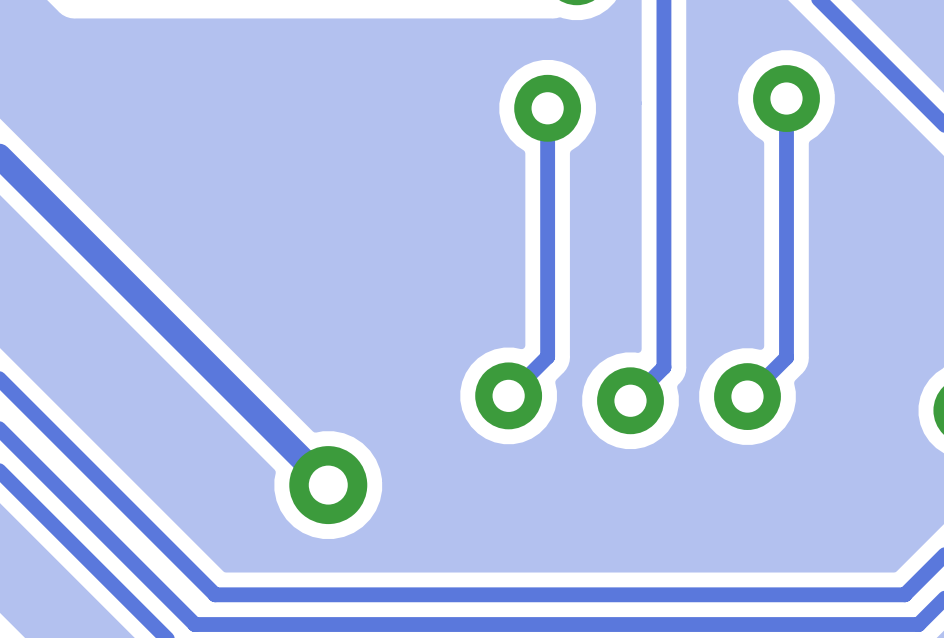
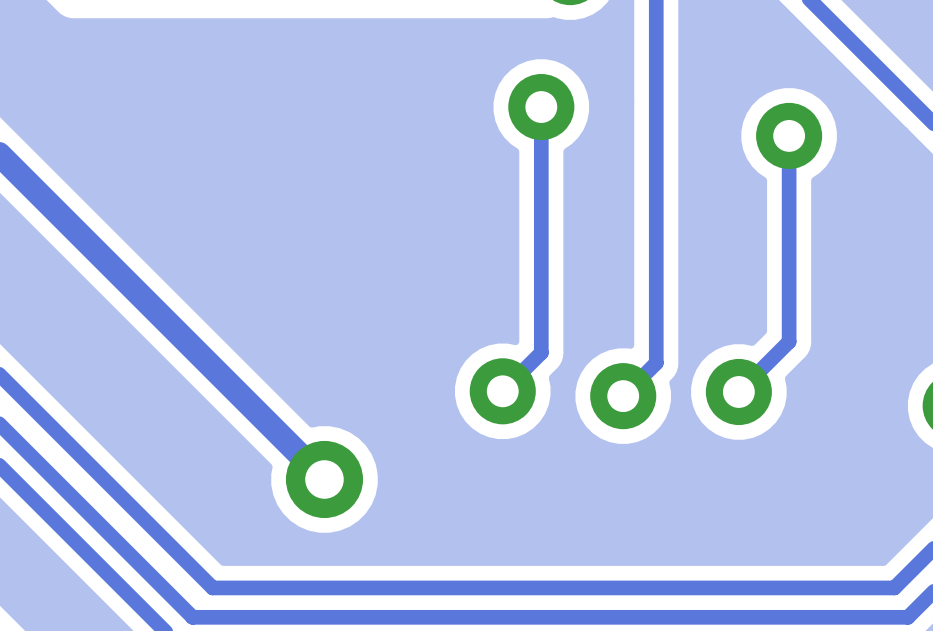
track: (786, 98) (786, 357) -> (789, 135) (789, 341) (777, 353)
via position: (786, 98) -> (789, 135)

